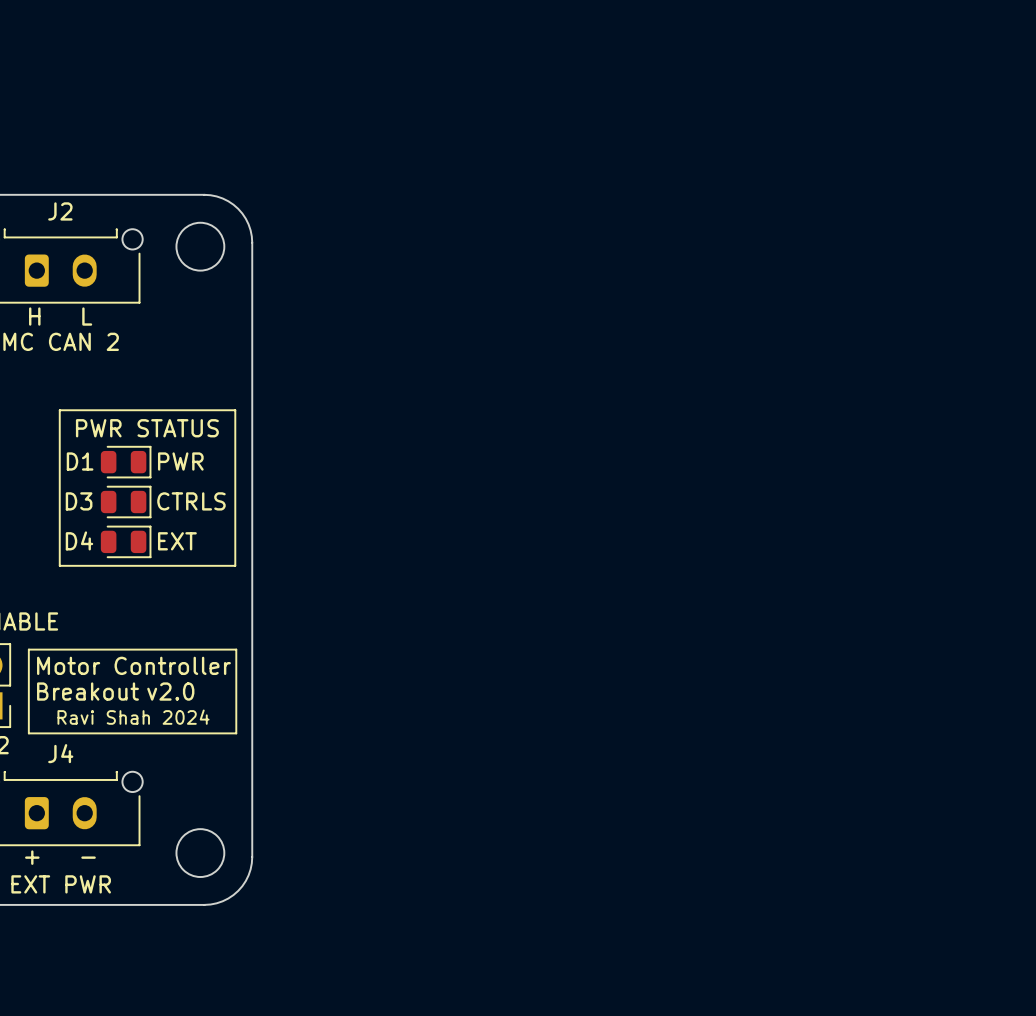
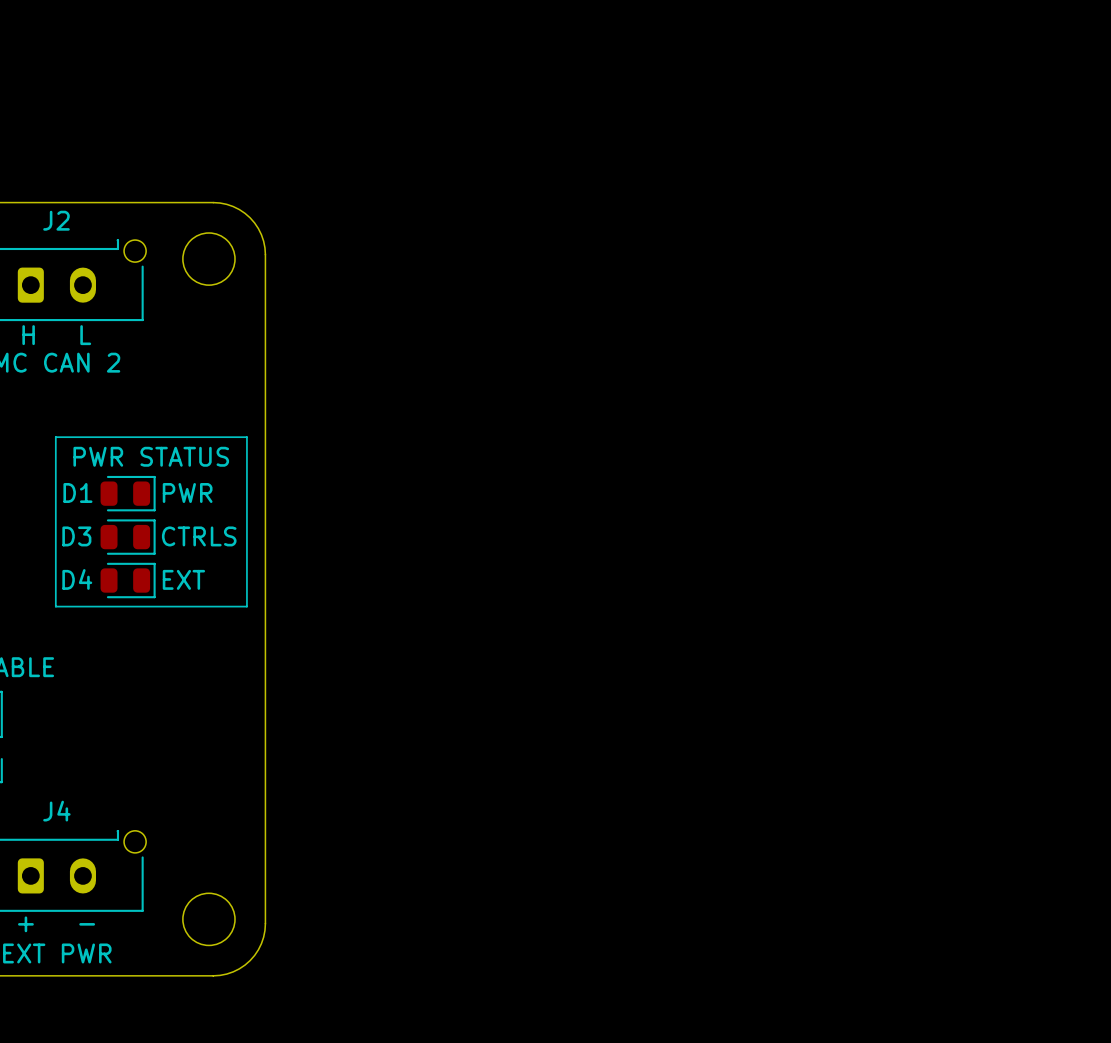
line: (28, 649) (236, 649) (236, 733) (28, 733) (28, 649) -> none
text: Motor Controller (133, 665) -> none
text: Breakout (87, 691) -> none
text: v2.0 (170, 691) -> none
text: Ravi Shah 2024 (133, 717) -> none

